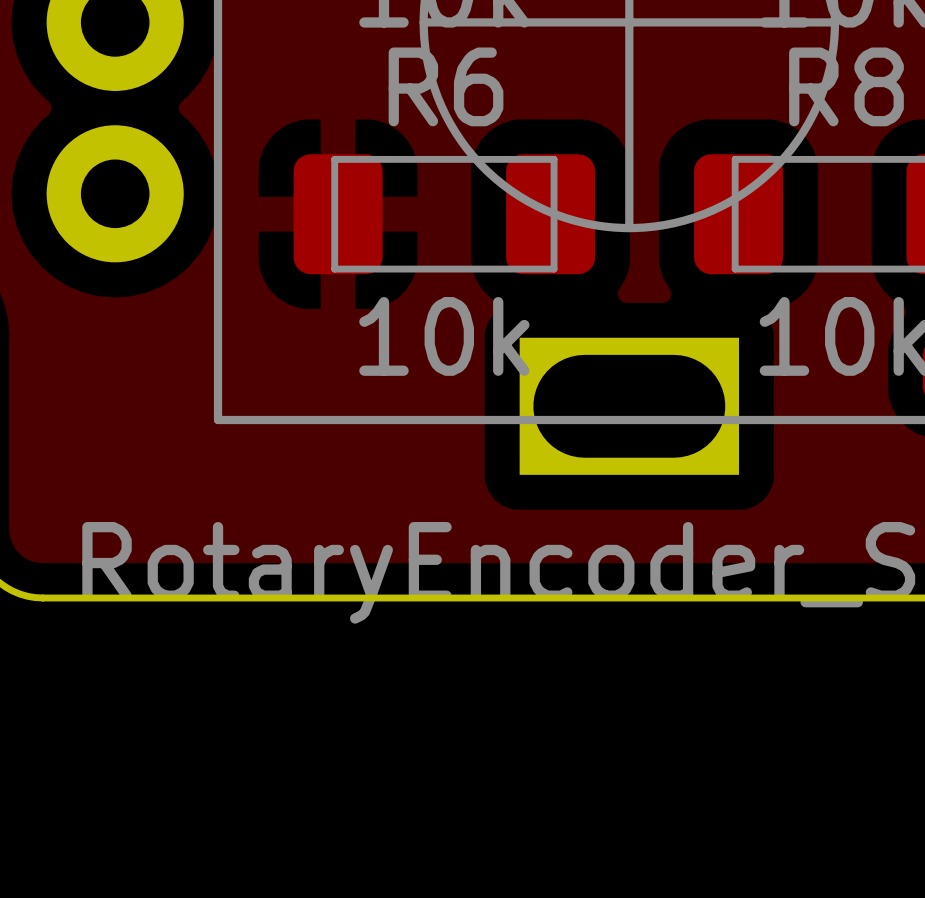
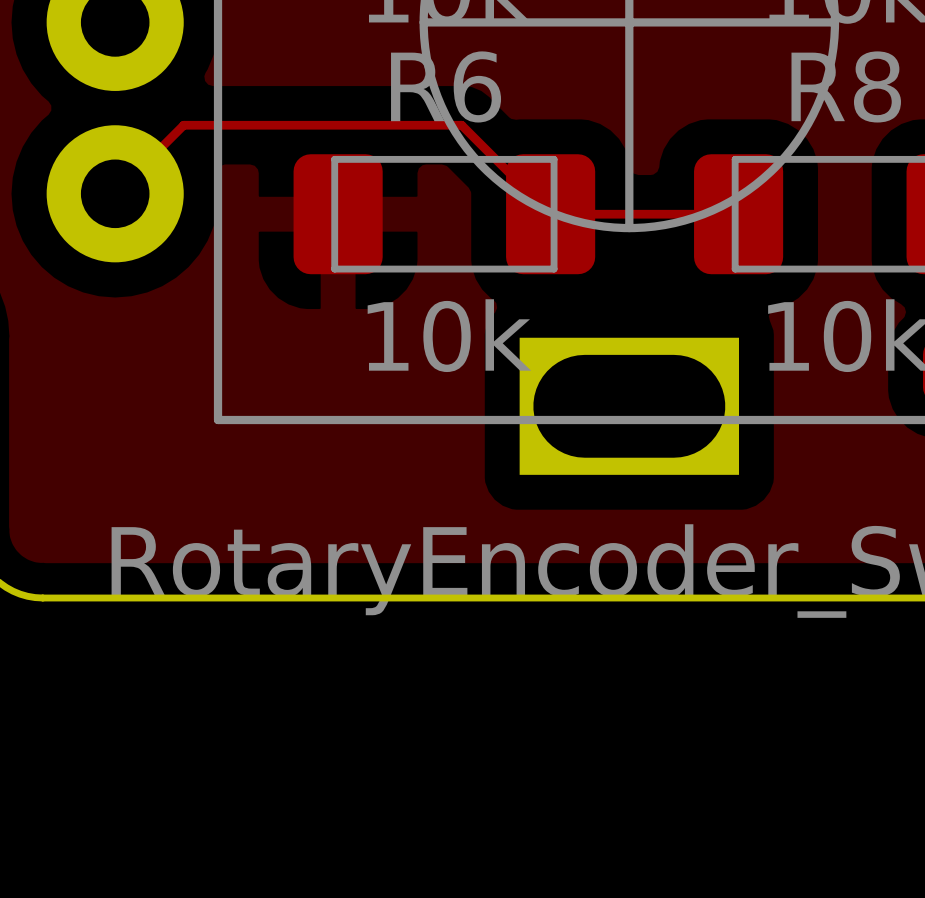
track: none -> (115, 193) (183, 125) (461, 125) (550, 214) (738, 214)

